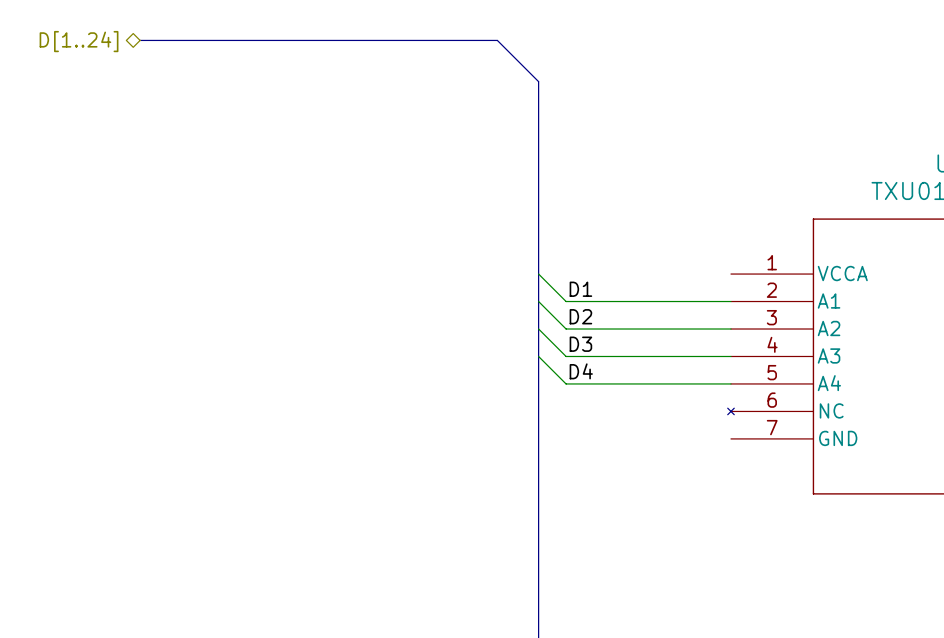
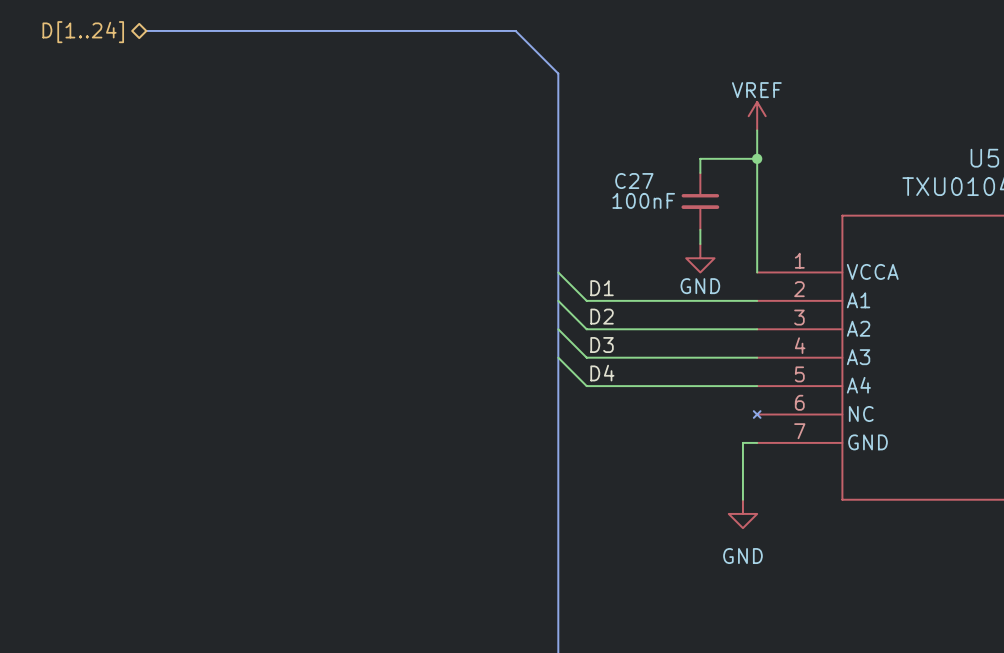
power symbol: none -> VREF (757, 116)
wire: none -> (757, 130) (757, 272)
wire: none -> (757, 158) (700, 158) (700, 173)
junction: none -> (757, 158)
C27: none -> 100nF (700, 201)
wire: none -> (700, 229) (700, 244)
power symbol: none -> GND (700, 258)
wire: none -> (757, 442) (742, 442) (742, 499)
power symbol: none -> GND (742, 513)

